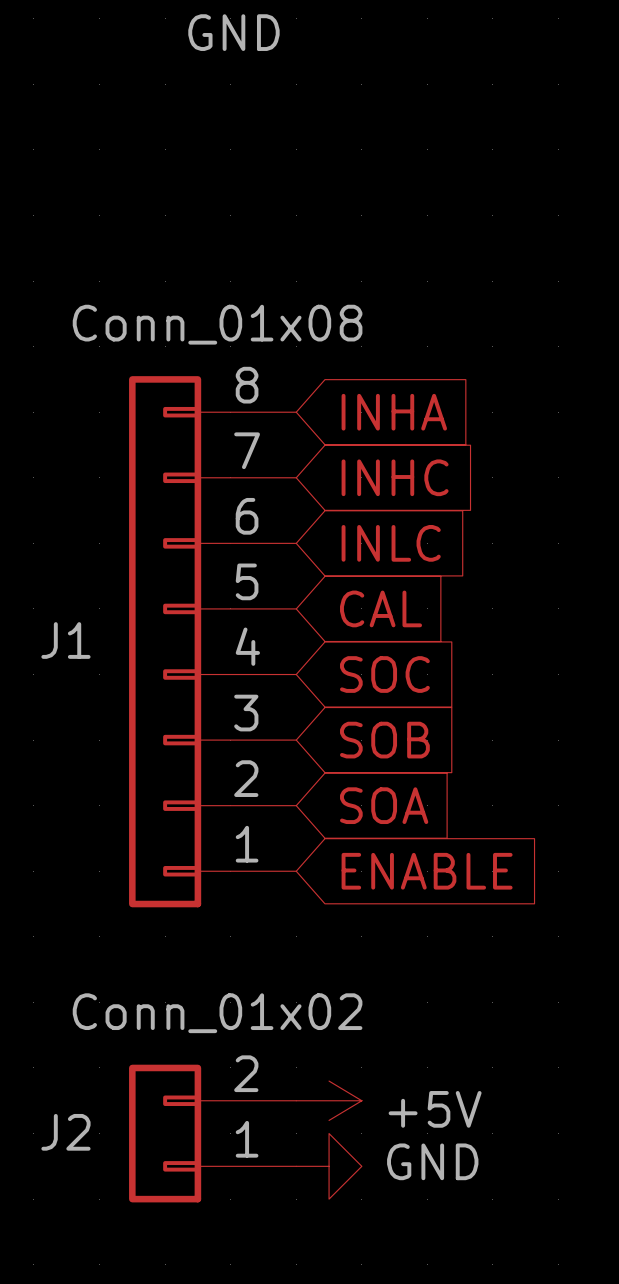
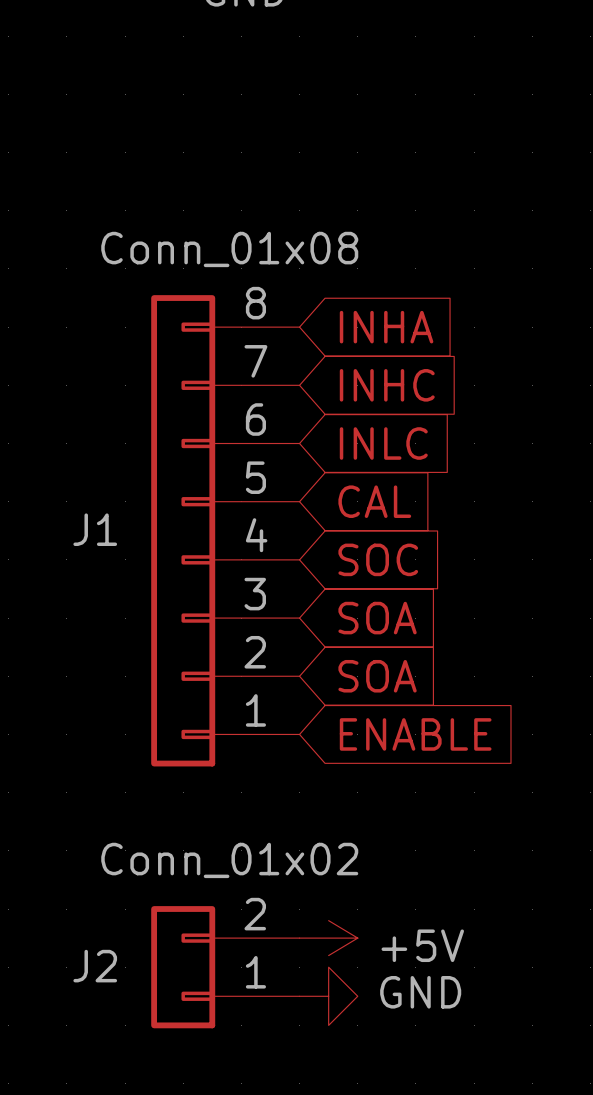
global label: SOB (384, 740) -> SOA (377, 618)

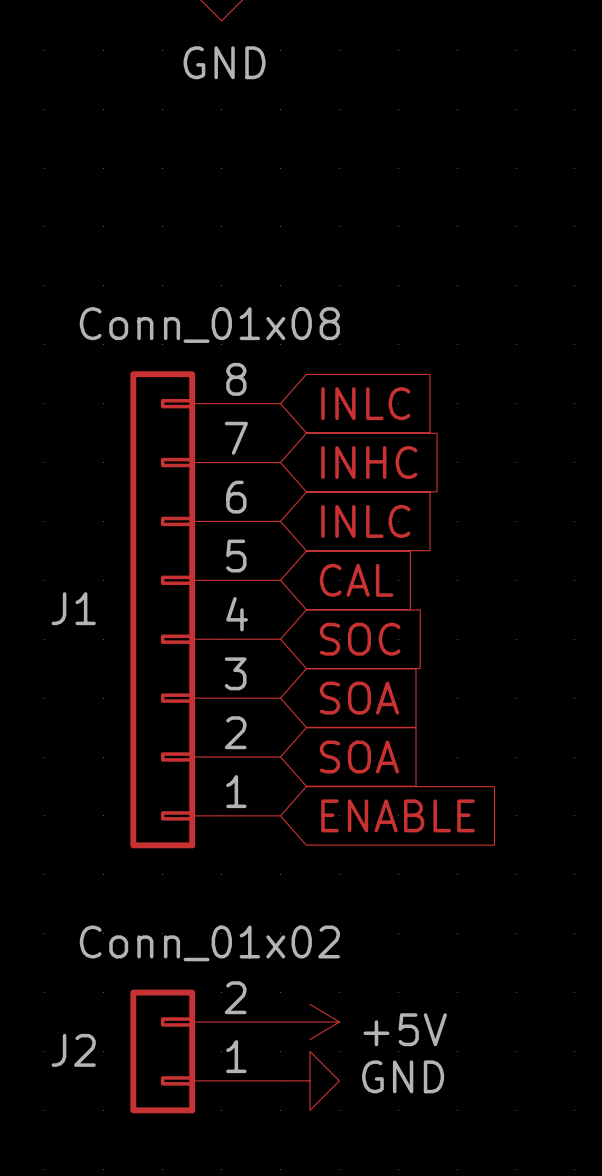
global label: INHA (386, 327) -> INLC (365, 403)

